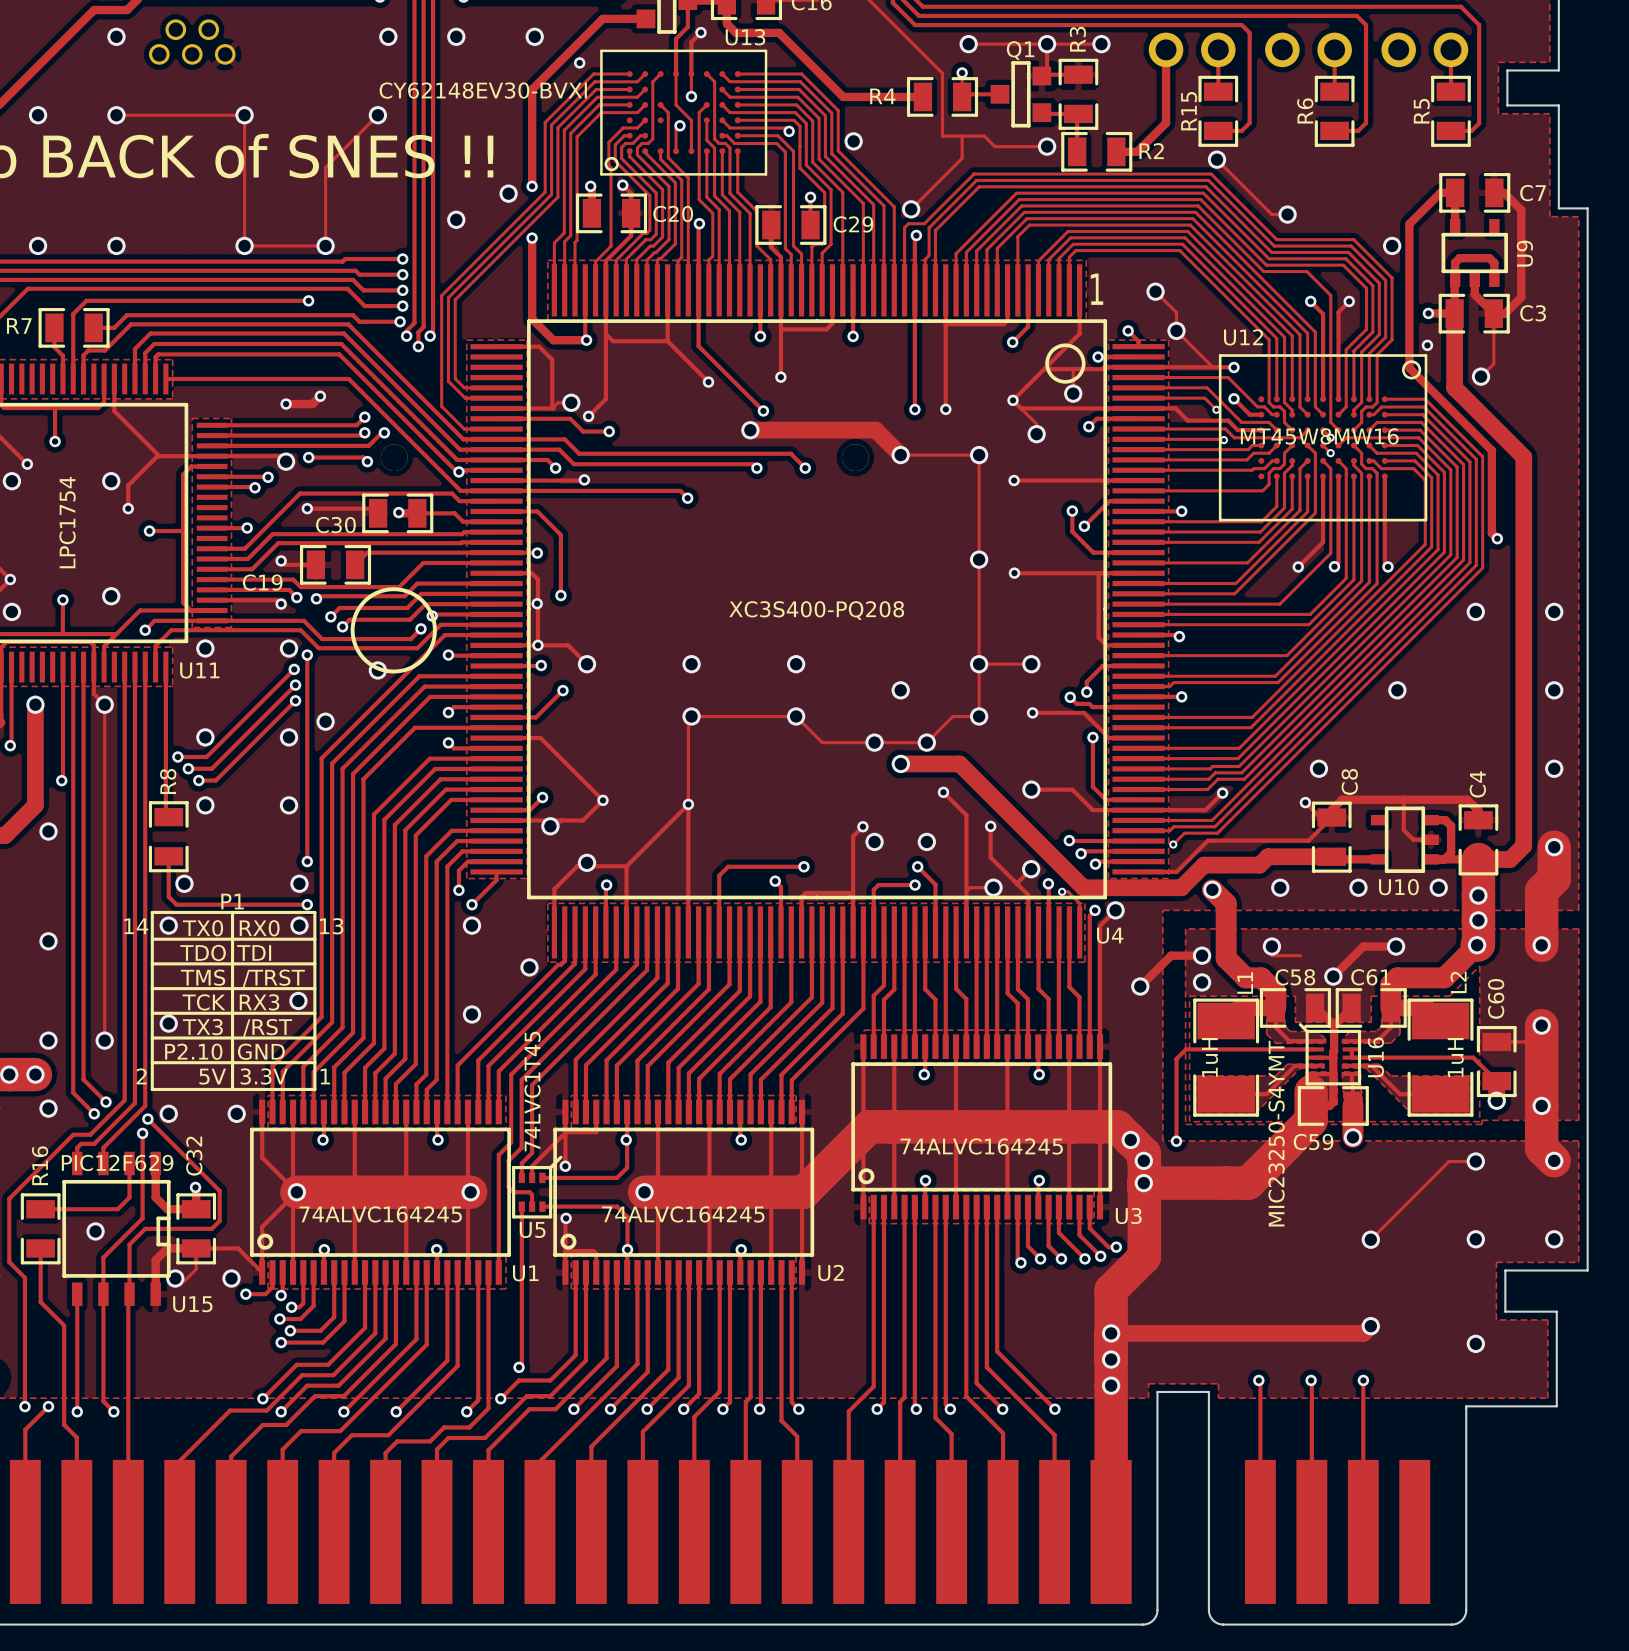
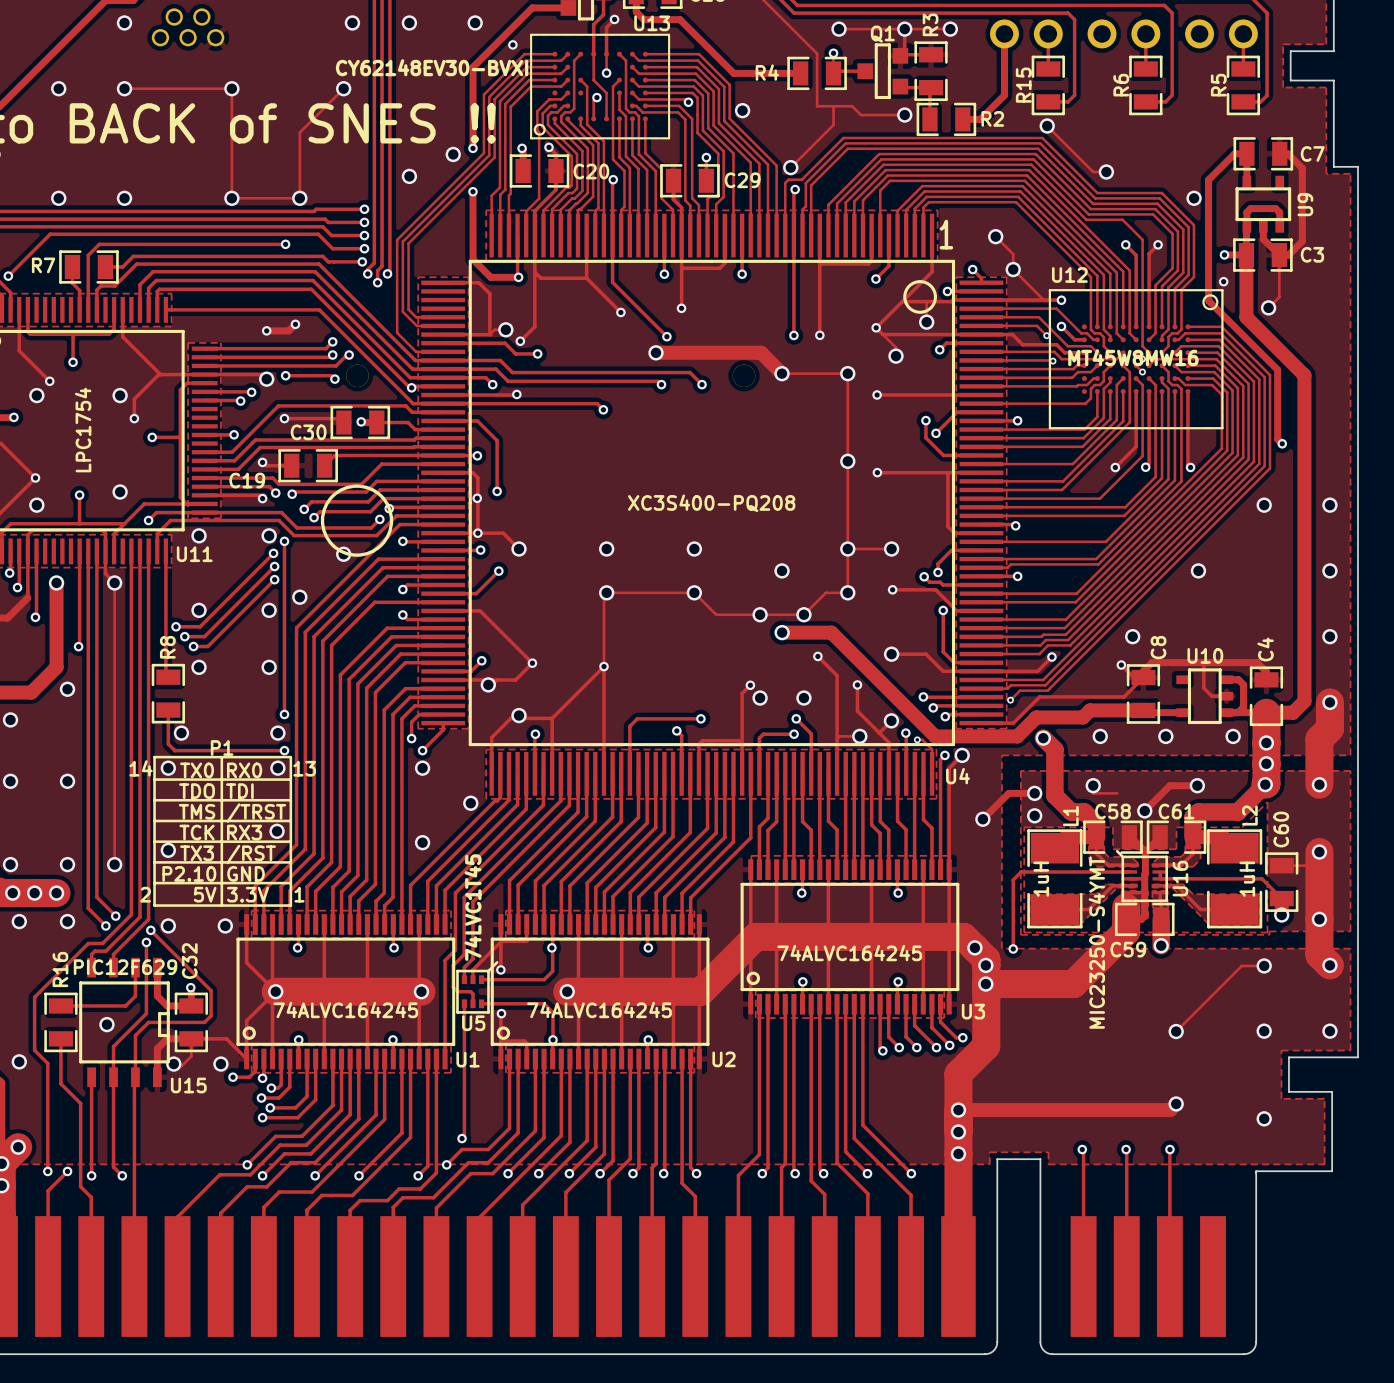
U10 name position: U10 (1398, 887) -> U10 (1205, 655)

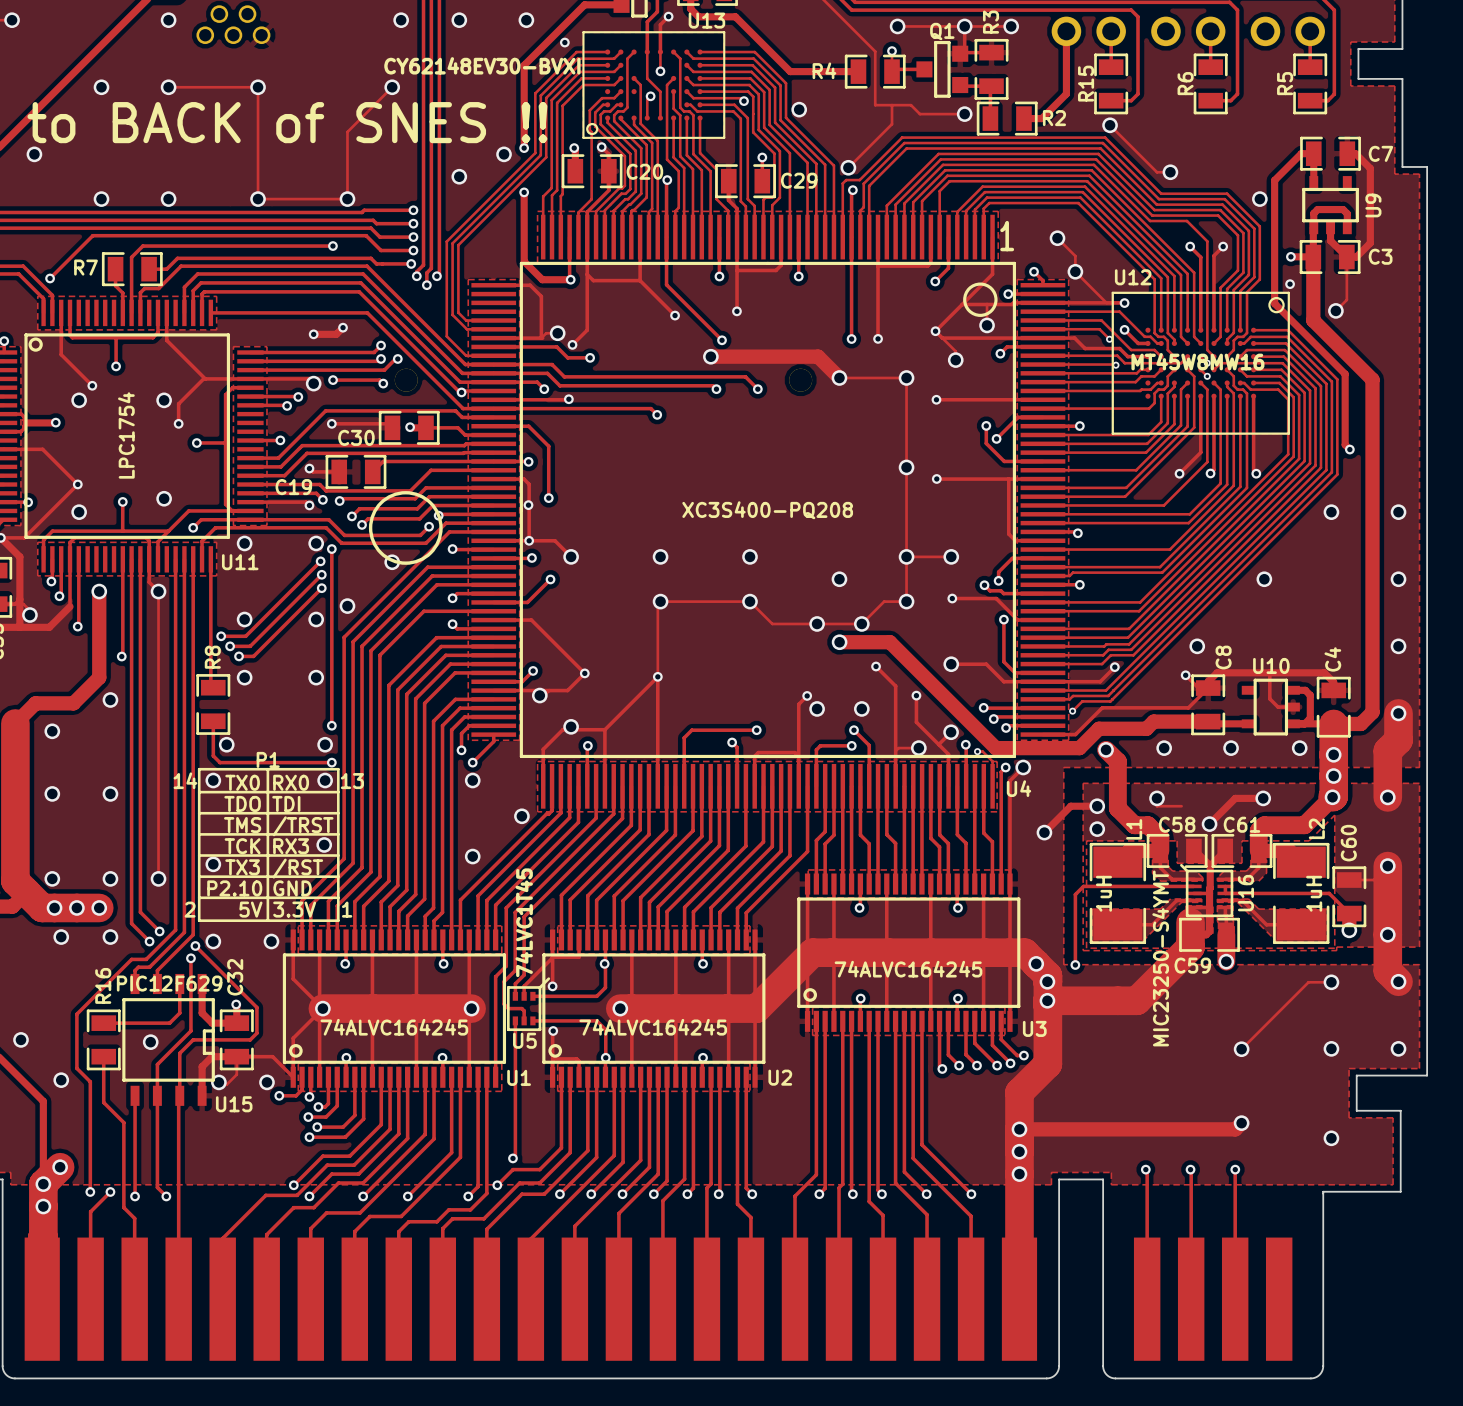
track: (212, 88) (231, 88) (231, 198) -> (258, 87) (258, 199) (278, 199)
via position: (231, 88) -> (258, 87)
via position: (231, 198) -> (258, 199)

